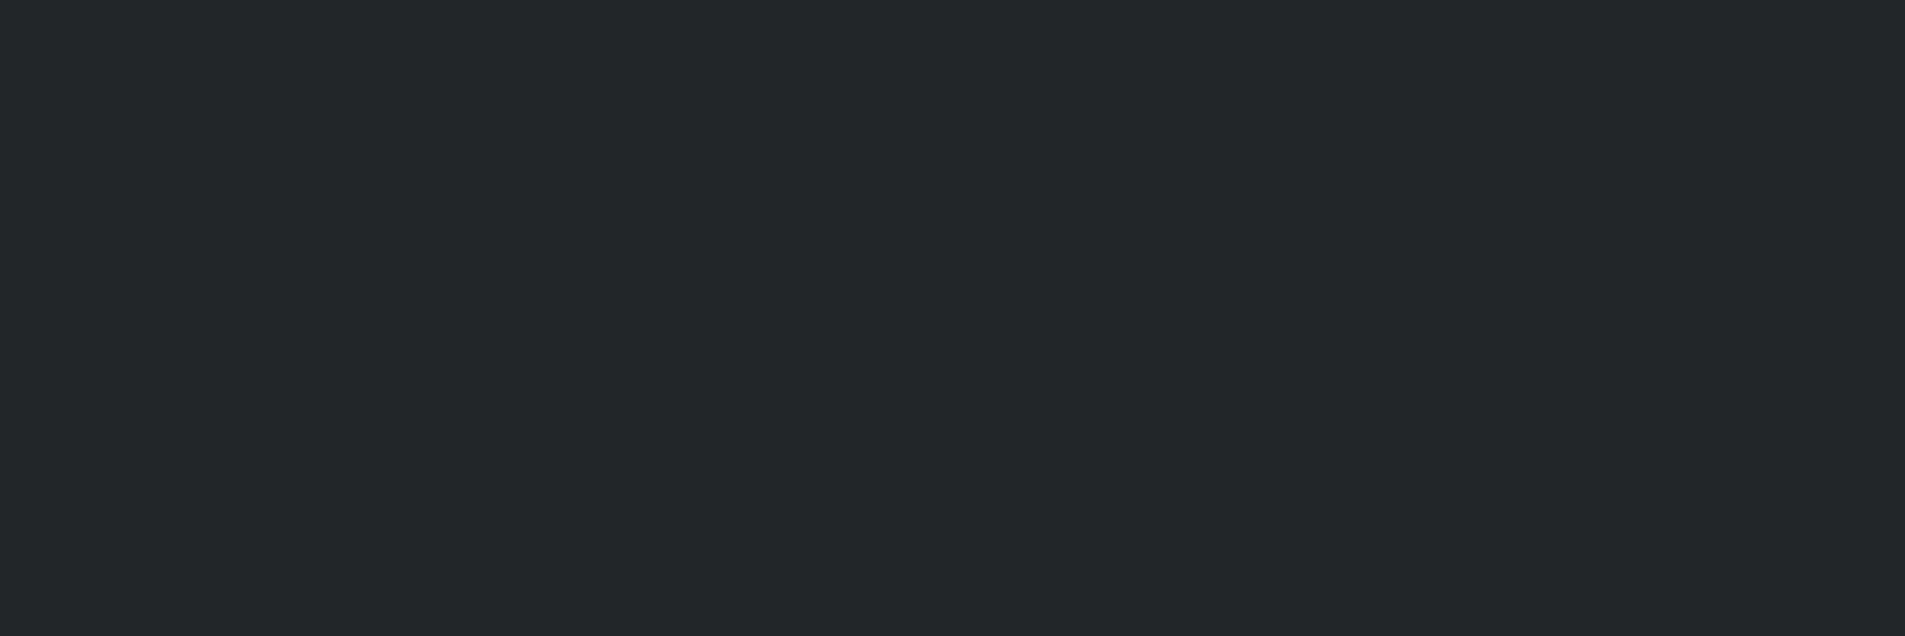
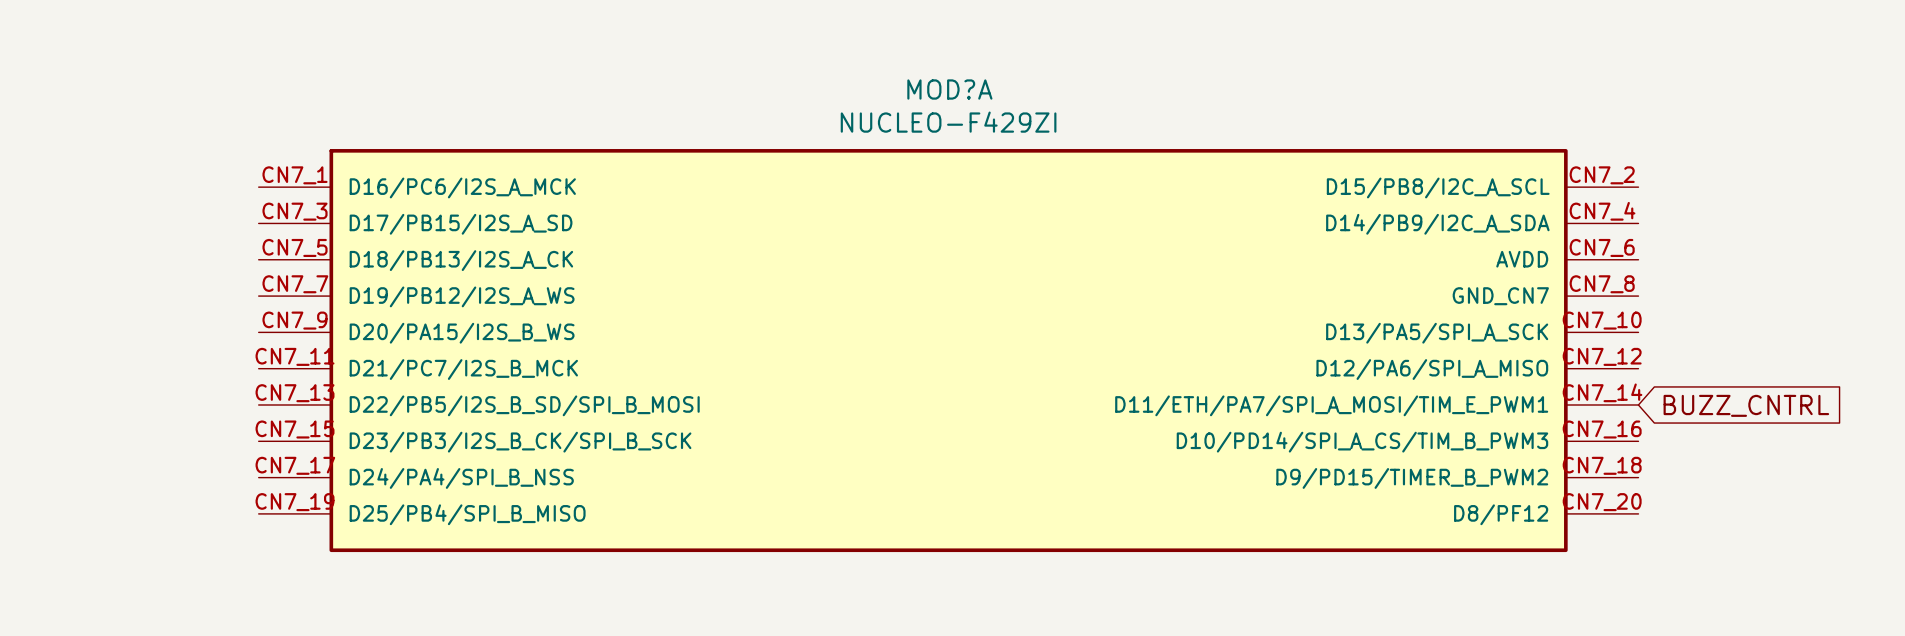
MOD?A: none -> NUCLEO-F429ZI (948, 350)
global label: none -> BUZZ_CNTRL (1746, 405)

